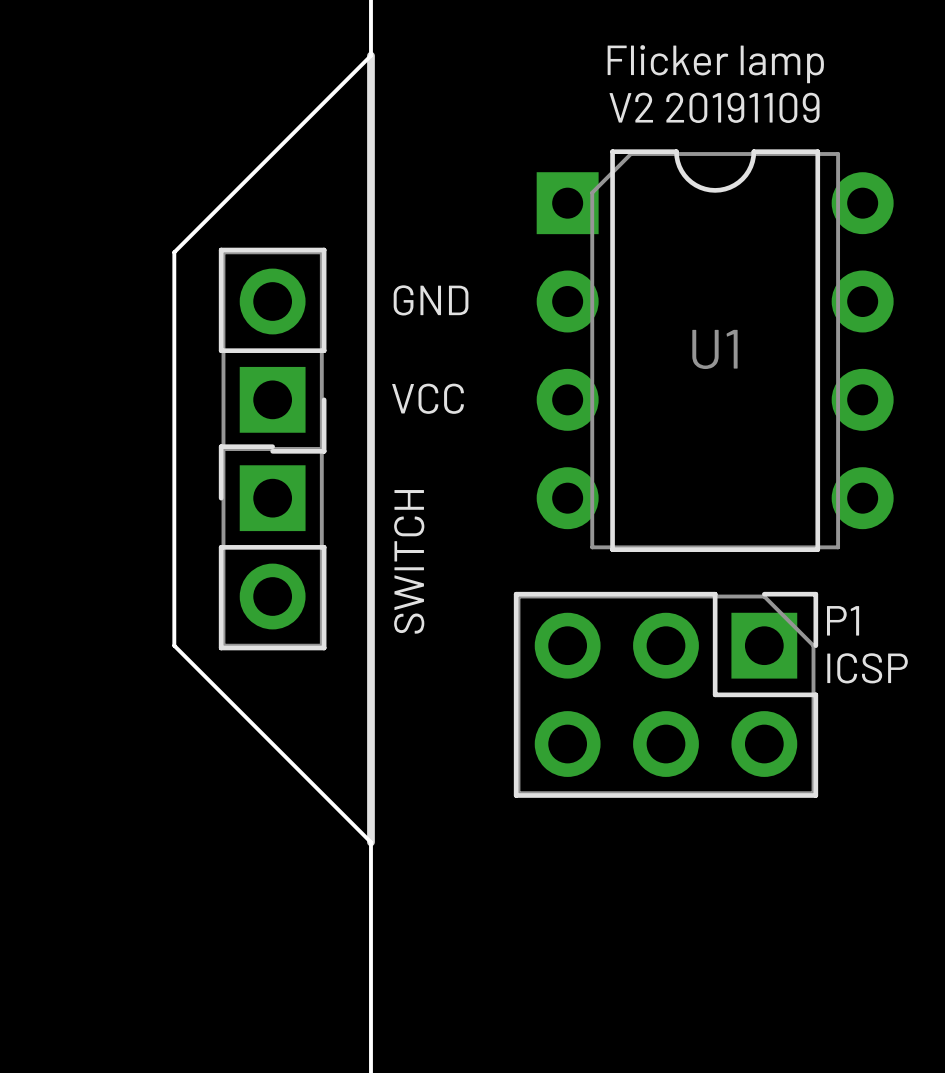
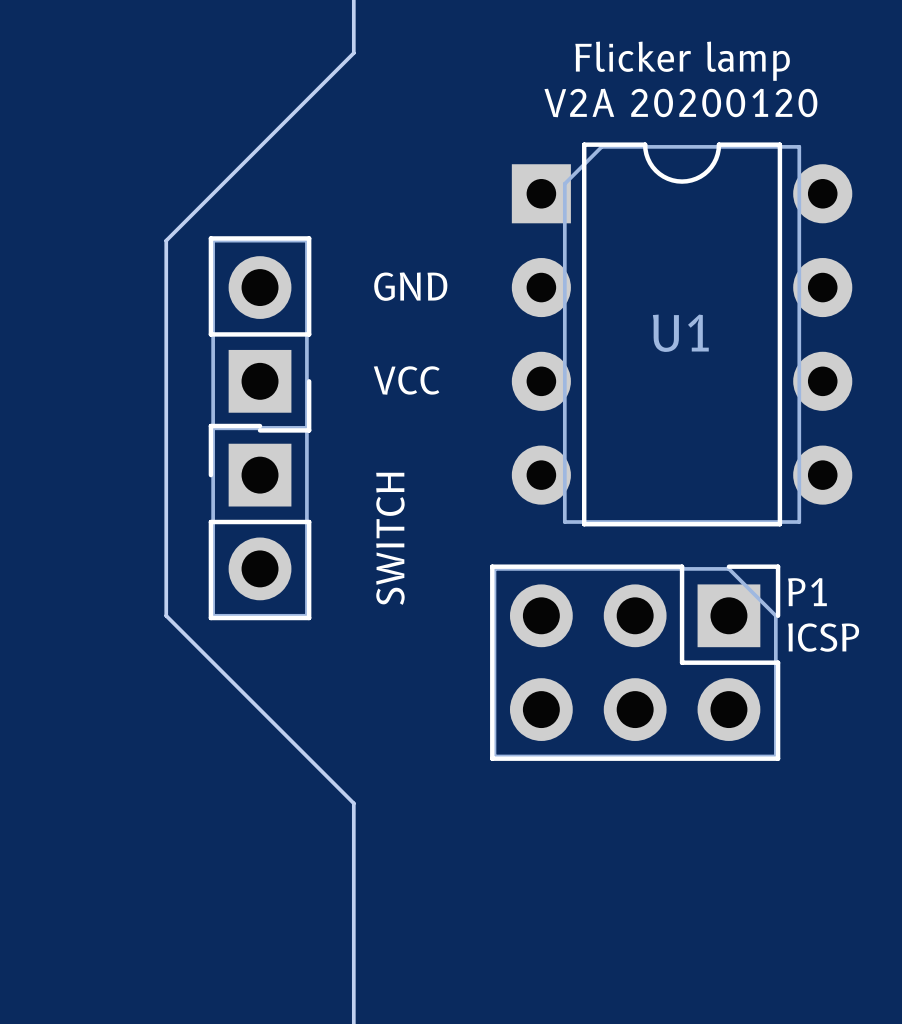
line: (370, 55) (370, 842) -> none
text: V2 20191109 (714, 107) -> V2A 20200120 (680, 103)

